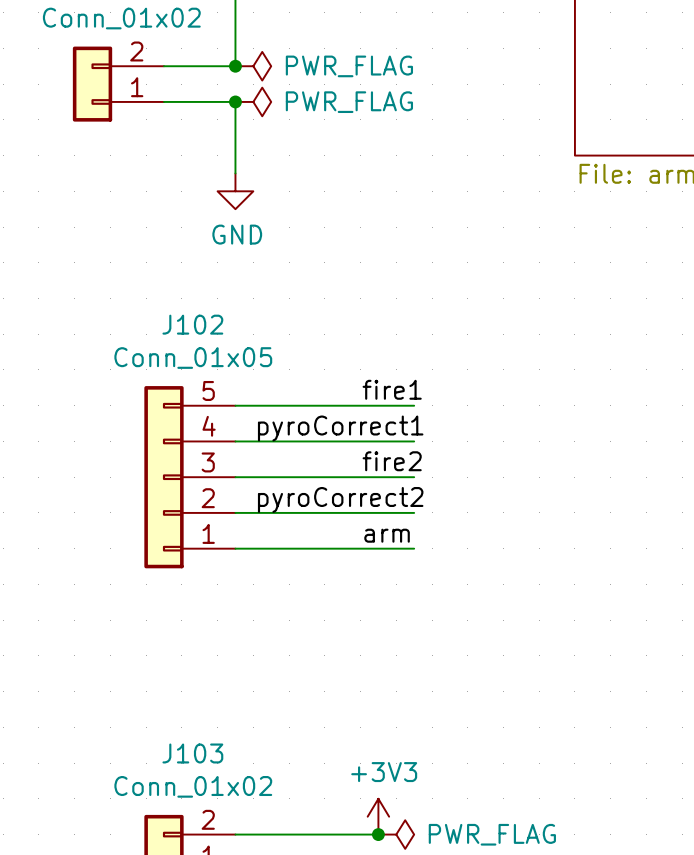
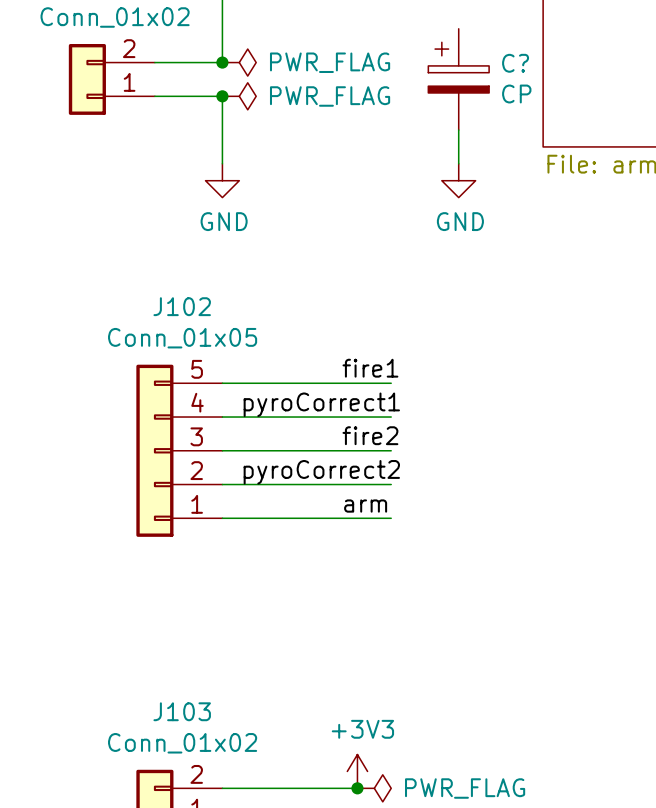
C?: none -> CP (458, 79)
wire: none -> (458, 130) (458, 163)
power symbol: none -> GND (458, 180)

